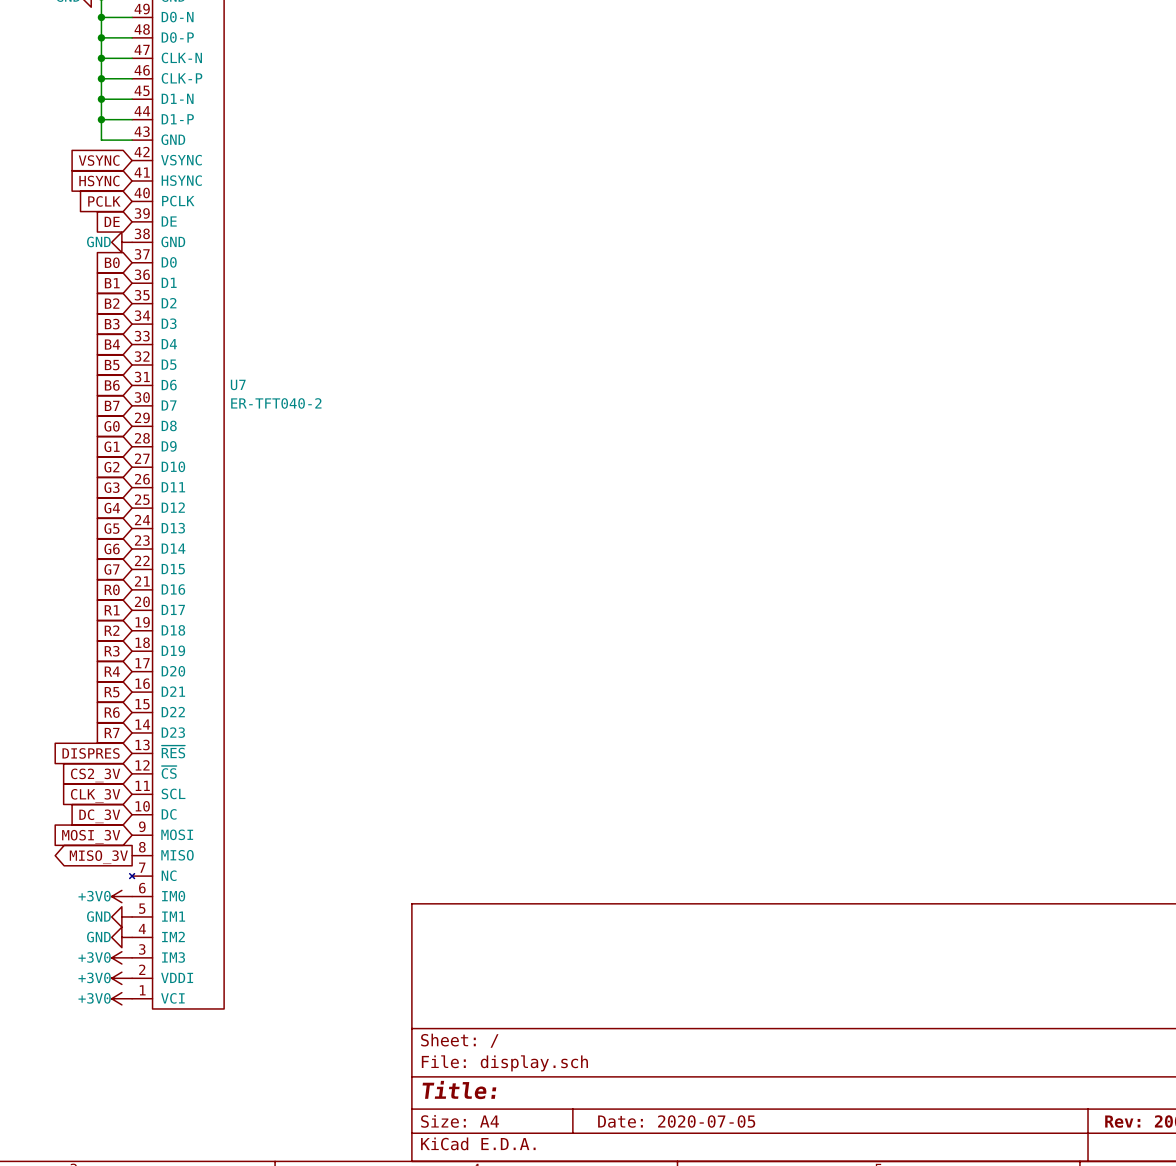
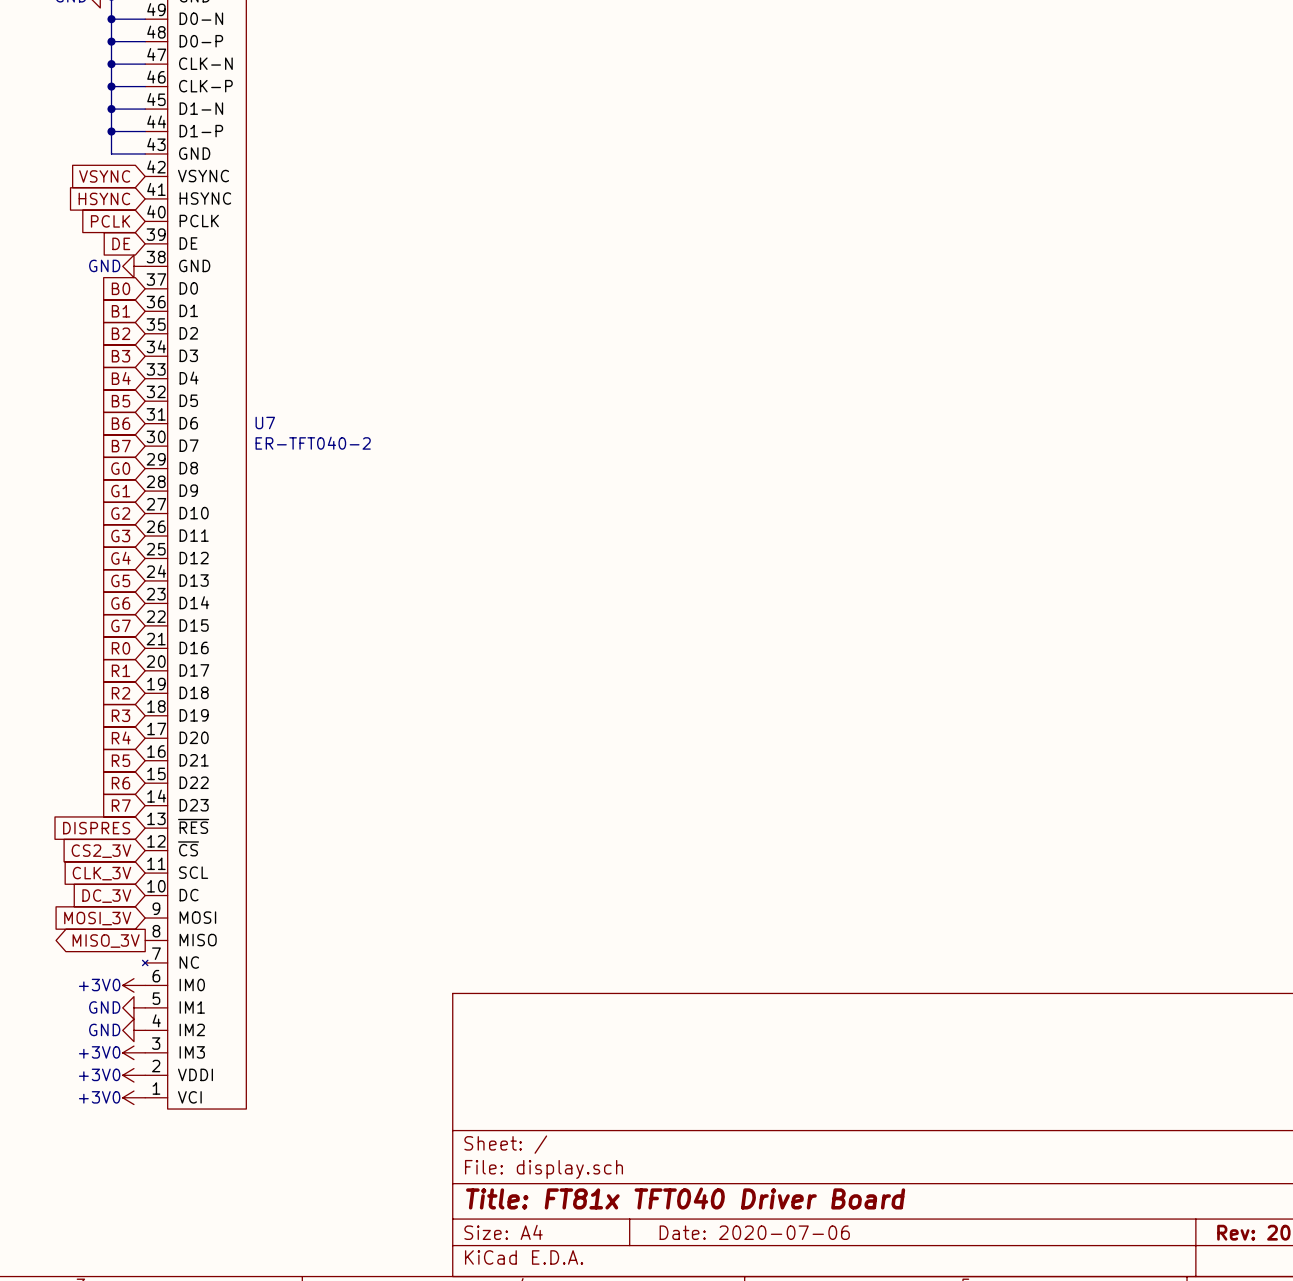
title block: Title: (459, 1090) -> Title: FT81x TFT040 Driver Board (685, 1198)
title block: Date: 2020-07-05 (676, 1121) -> Date: 2020-07-06 (754, 1232)

